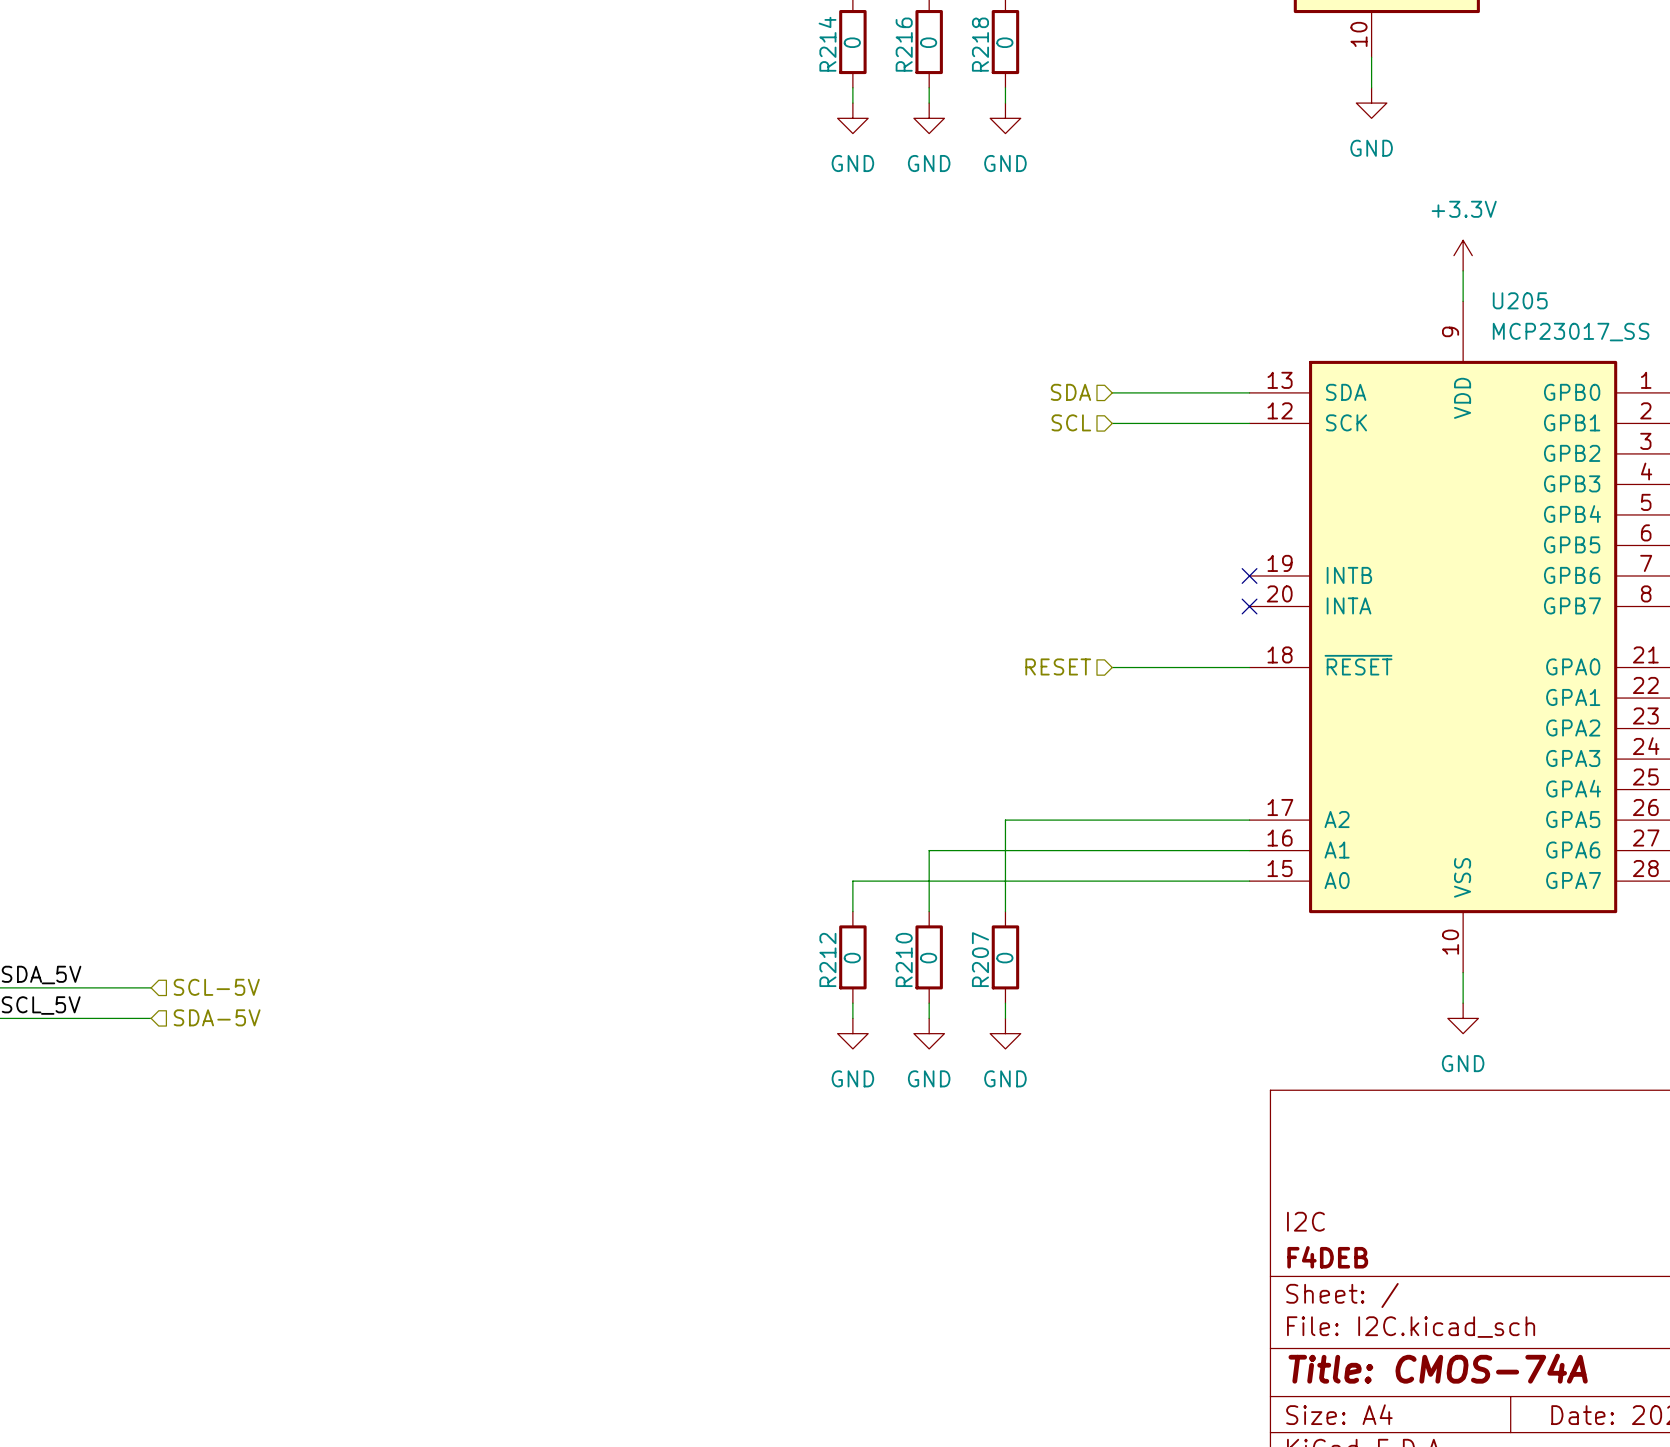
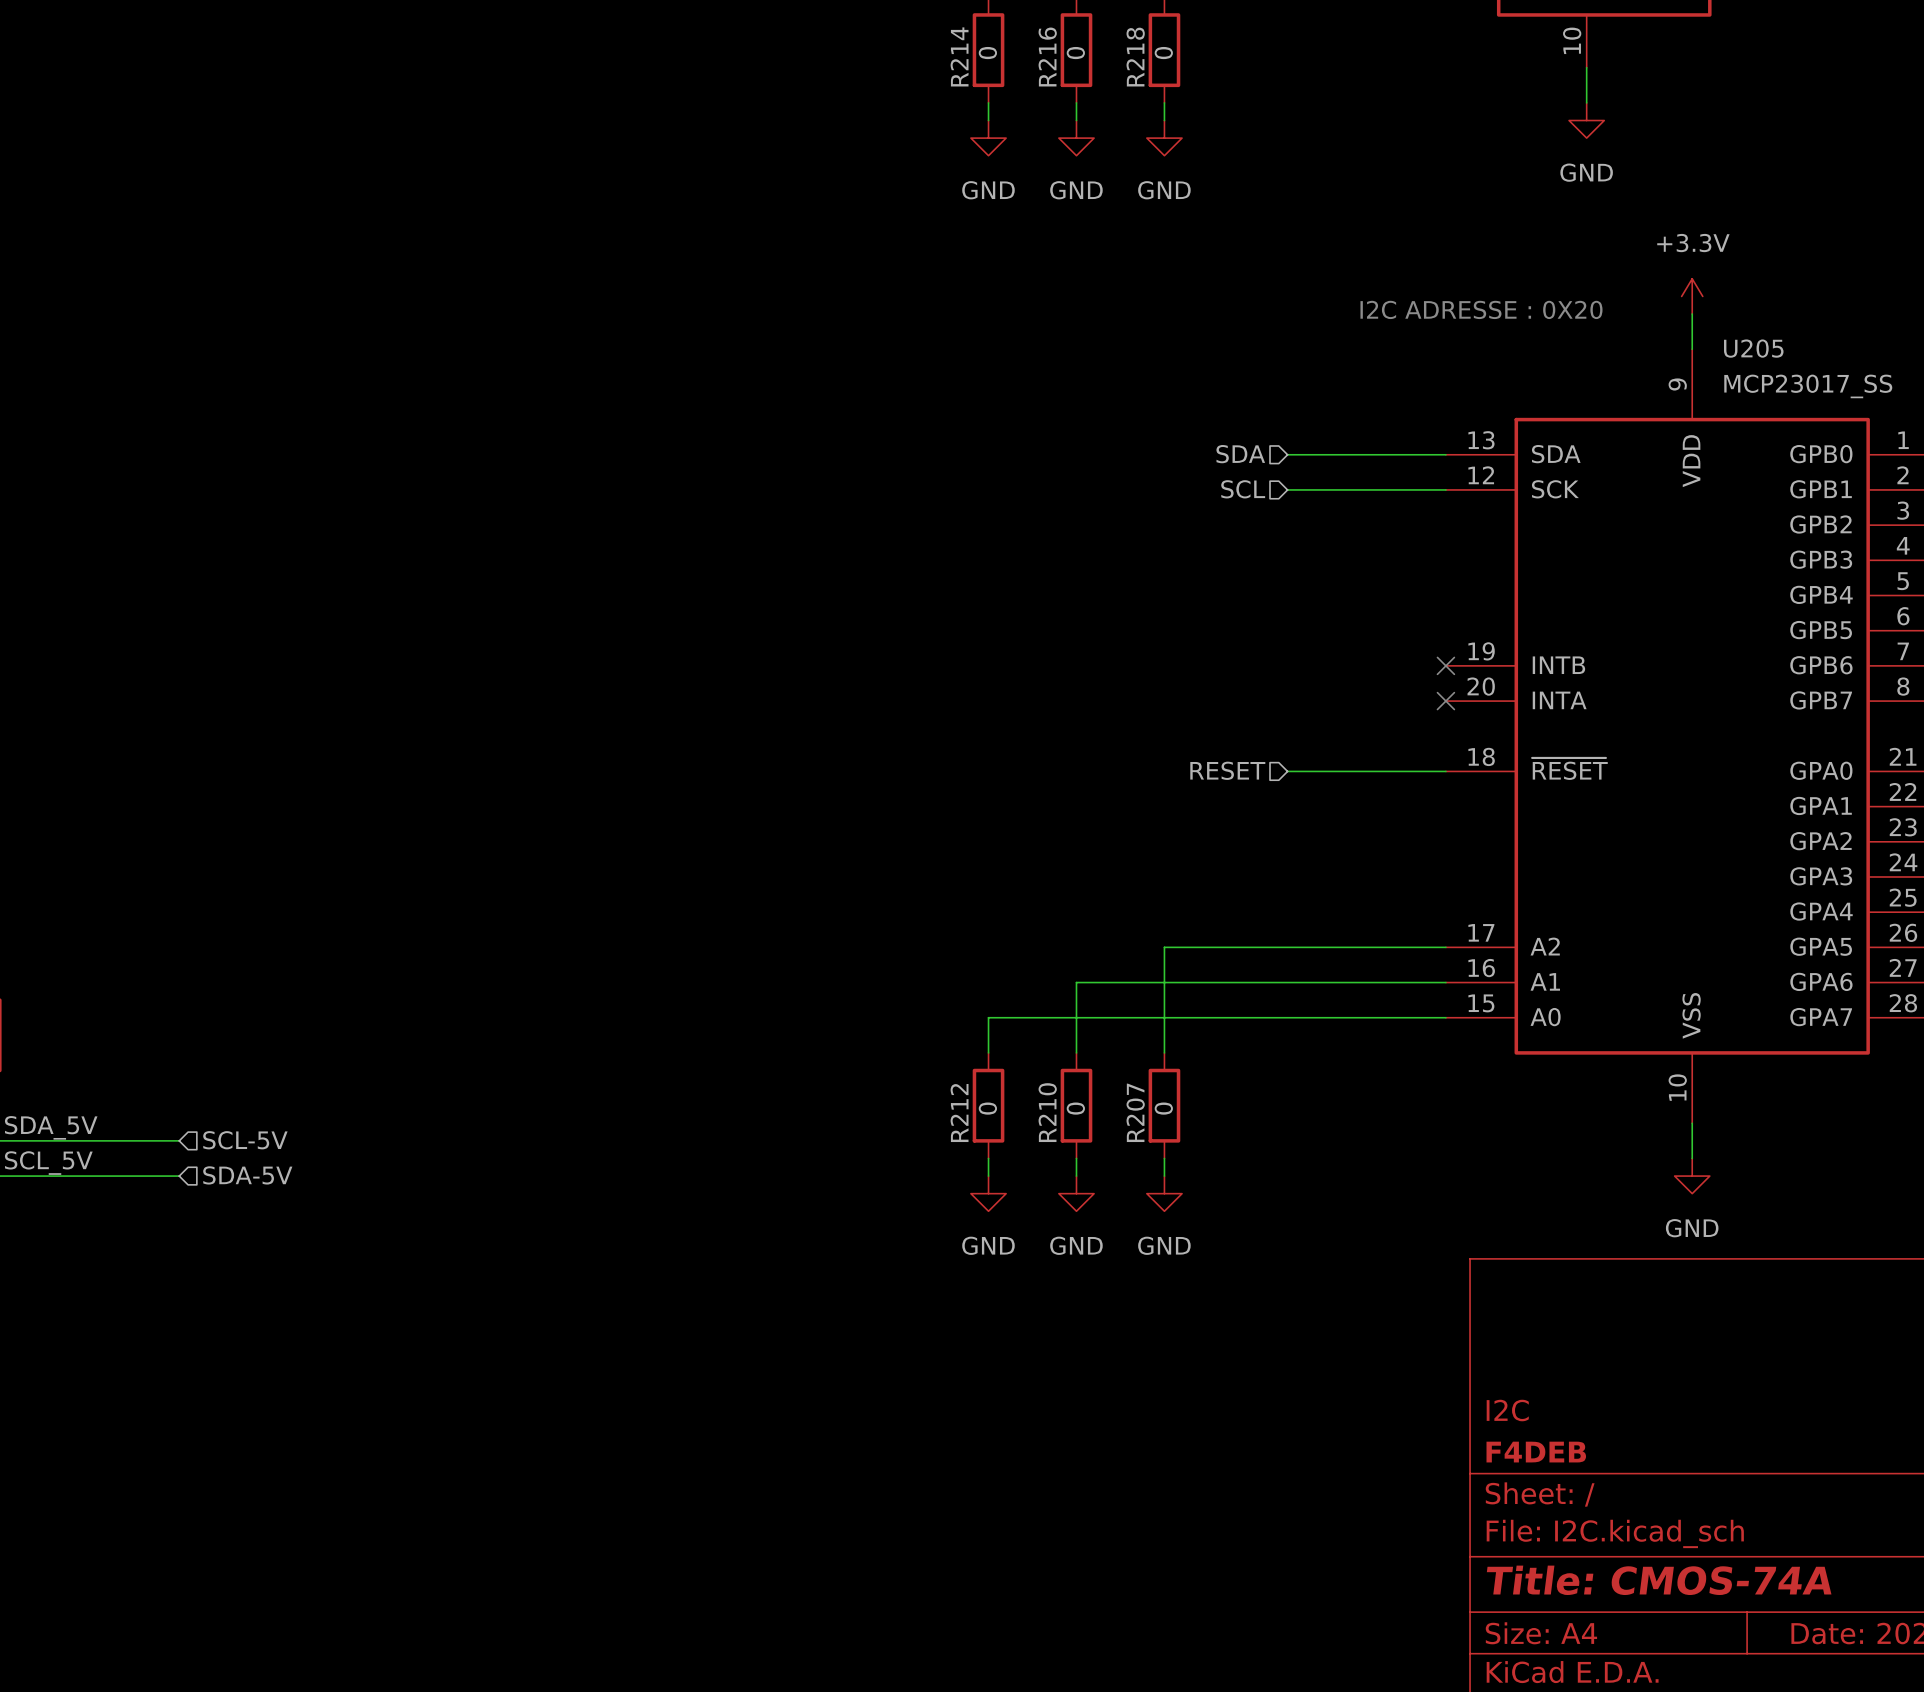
text: none -> I2C ADRESSE : 0X20 (1481, 309)

